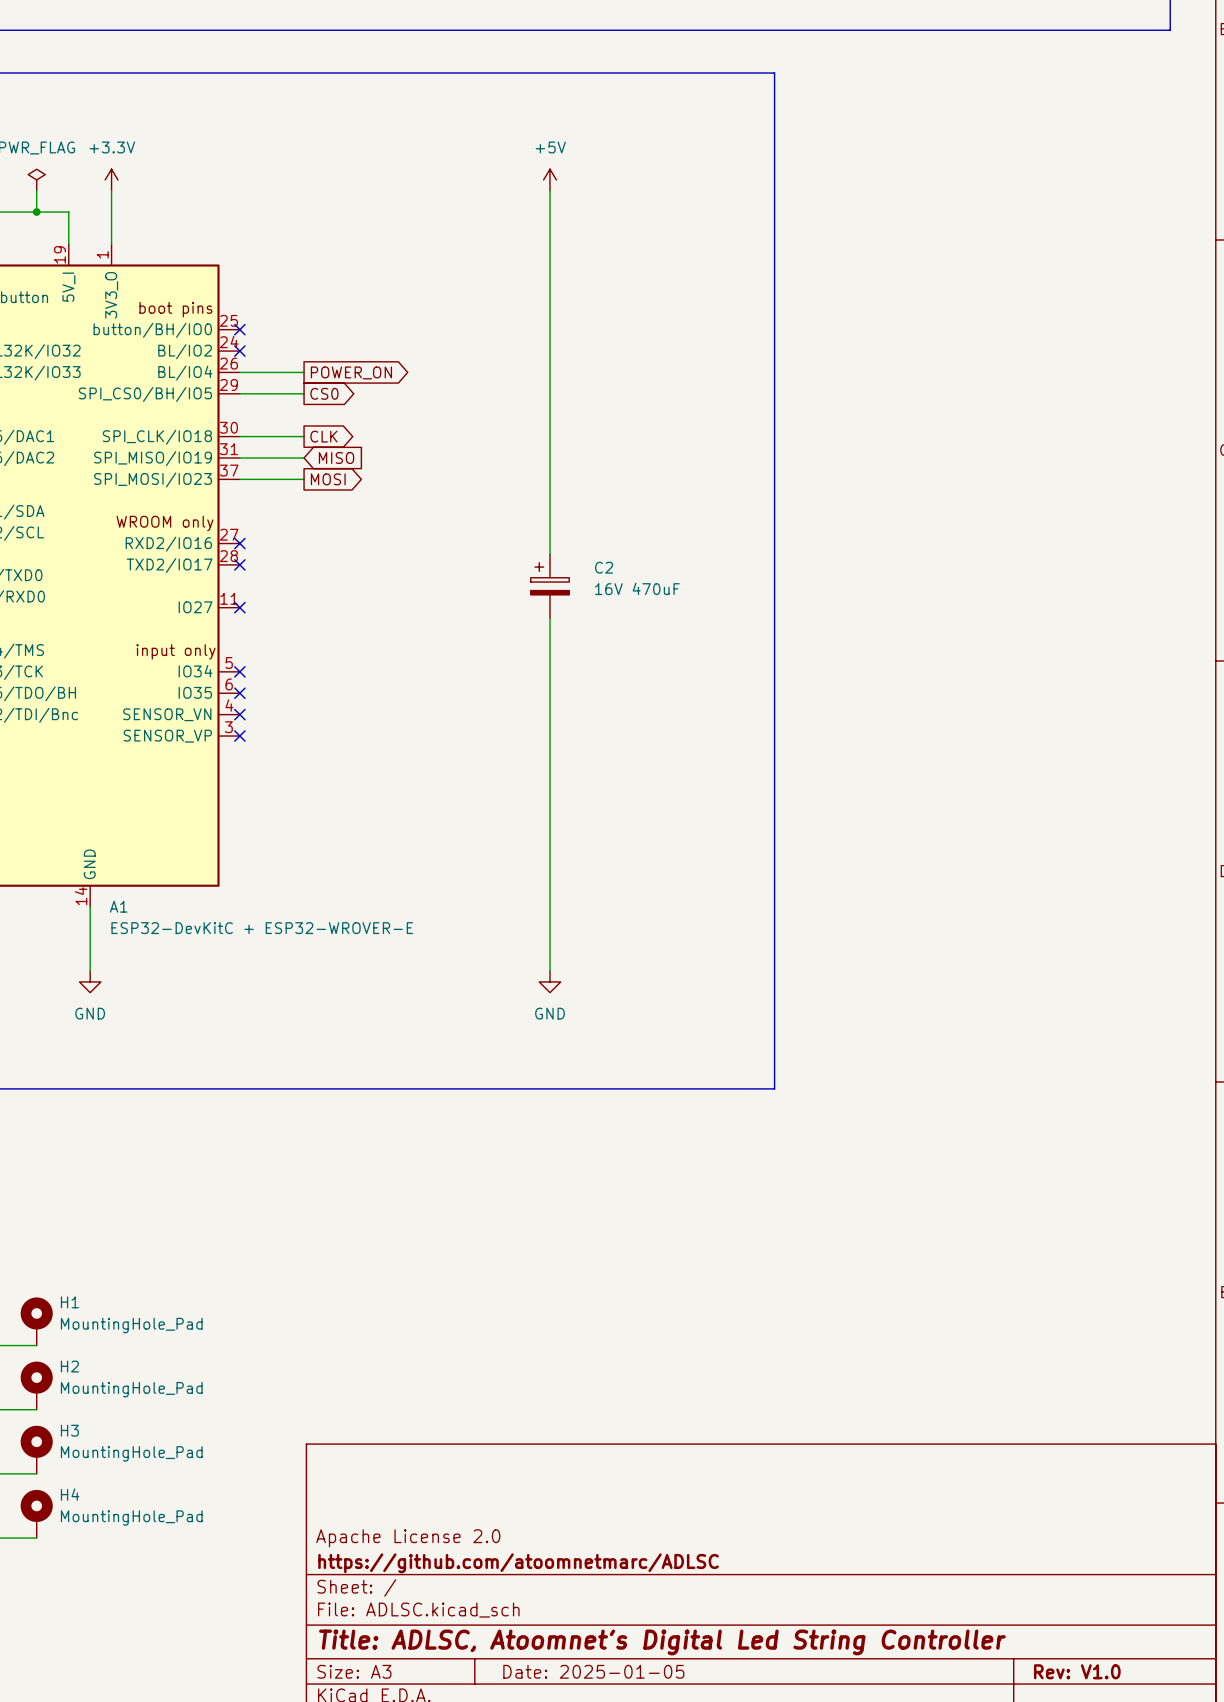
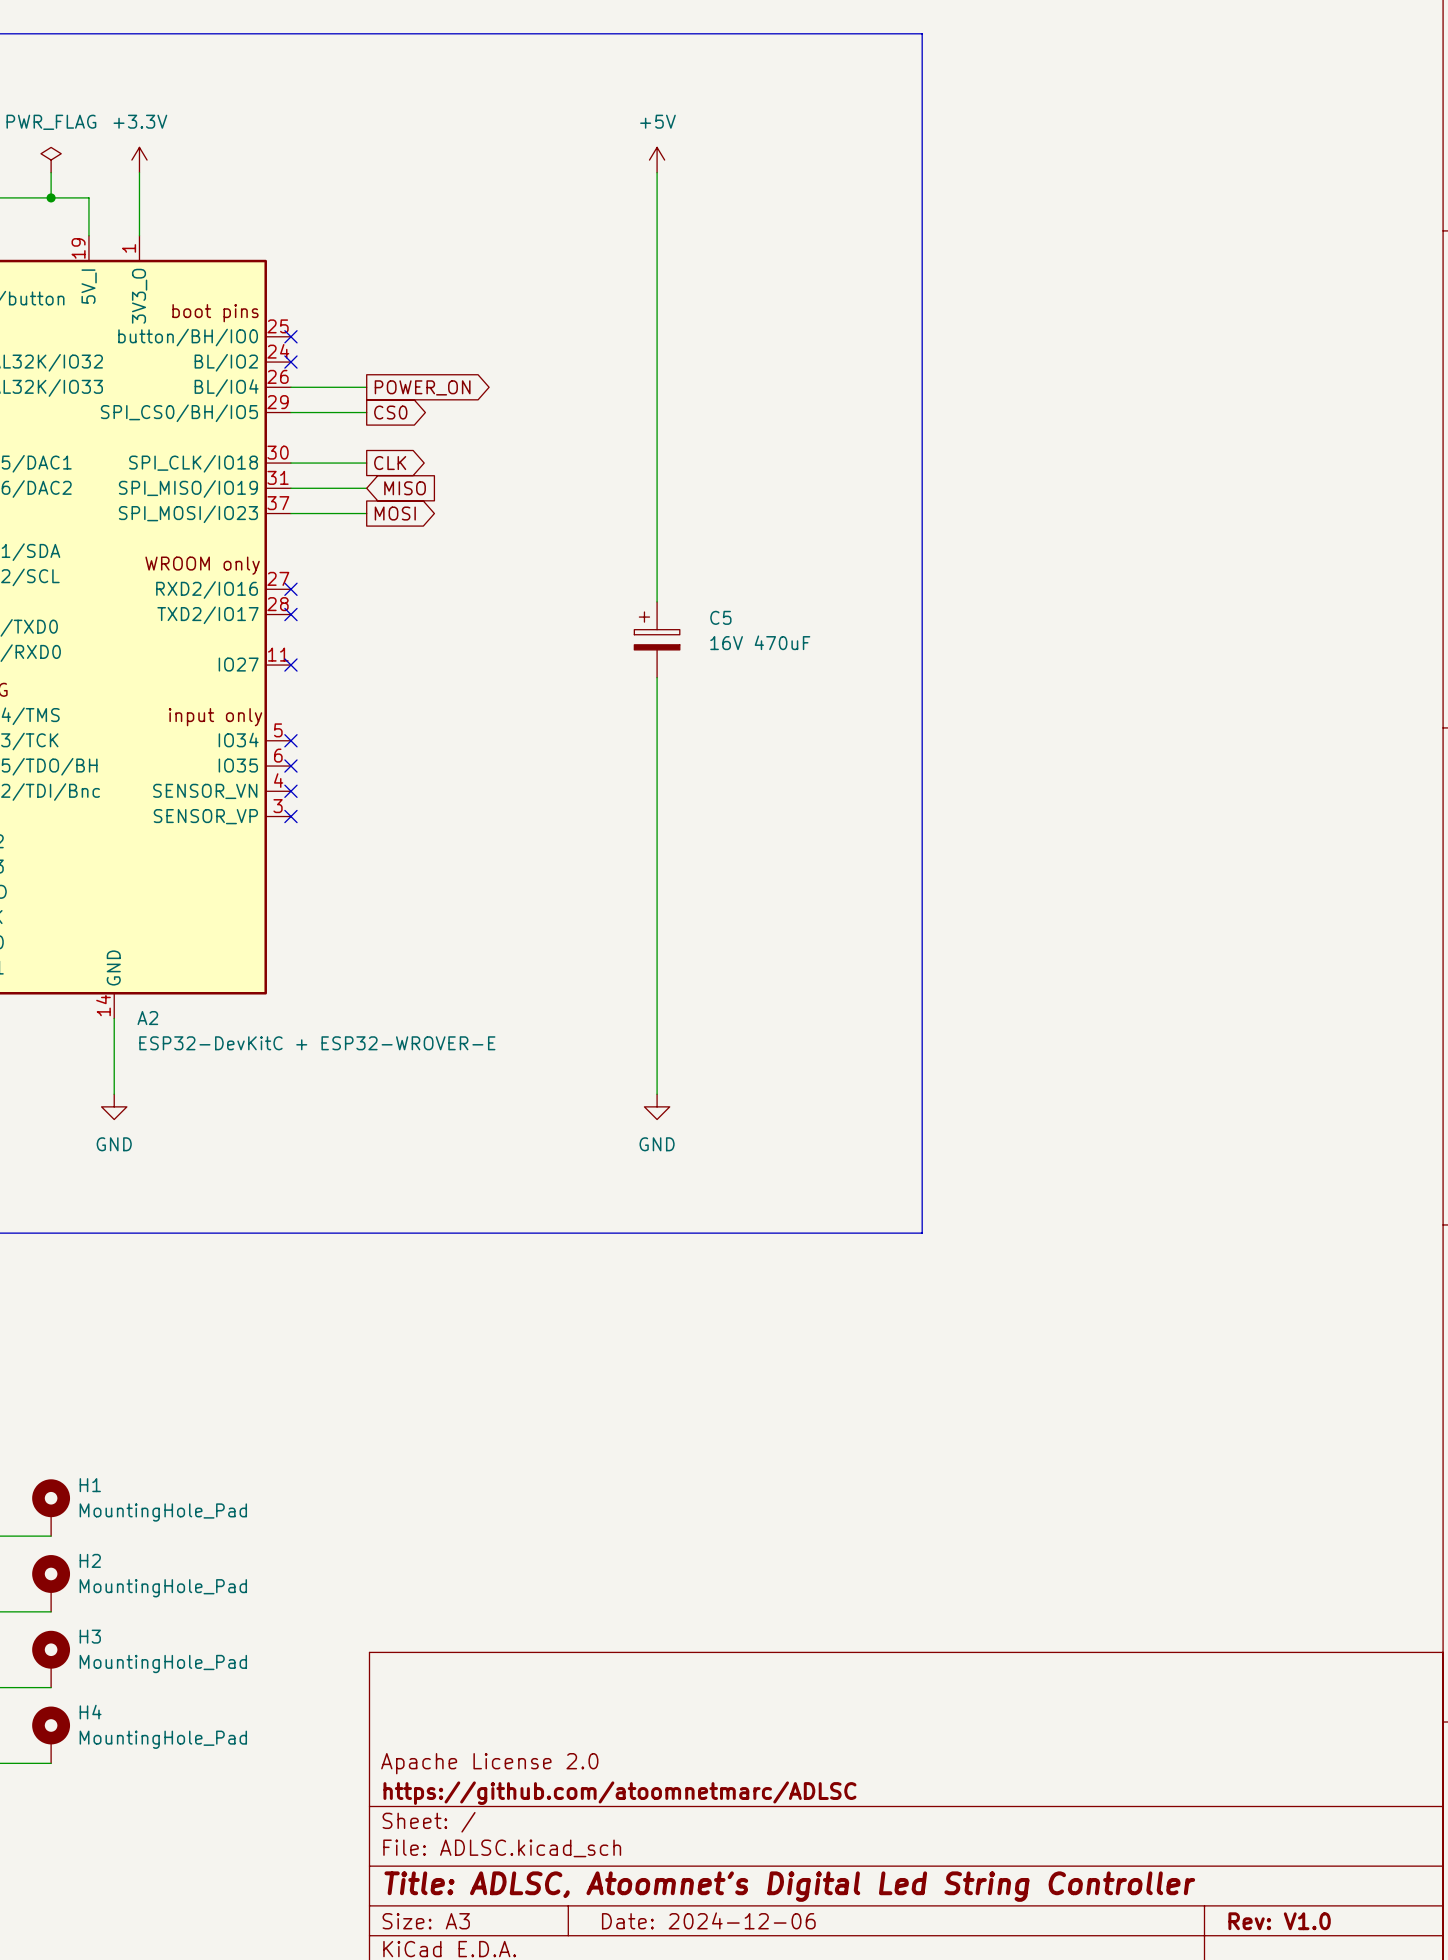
C2 name: C2 (604, 567) -> C5 (720, 617)
A1 name: A1 (118, 906) -> A2 (147, 1018)
title block: Date: 2025-01-05 (593, 1671) -> Date: 2024-12-06 (708, 1920)

